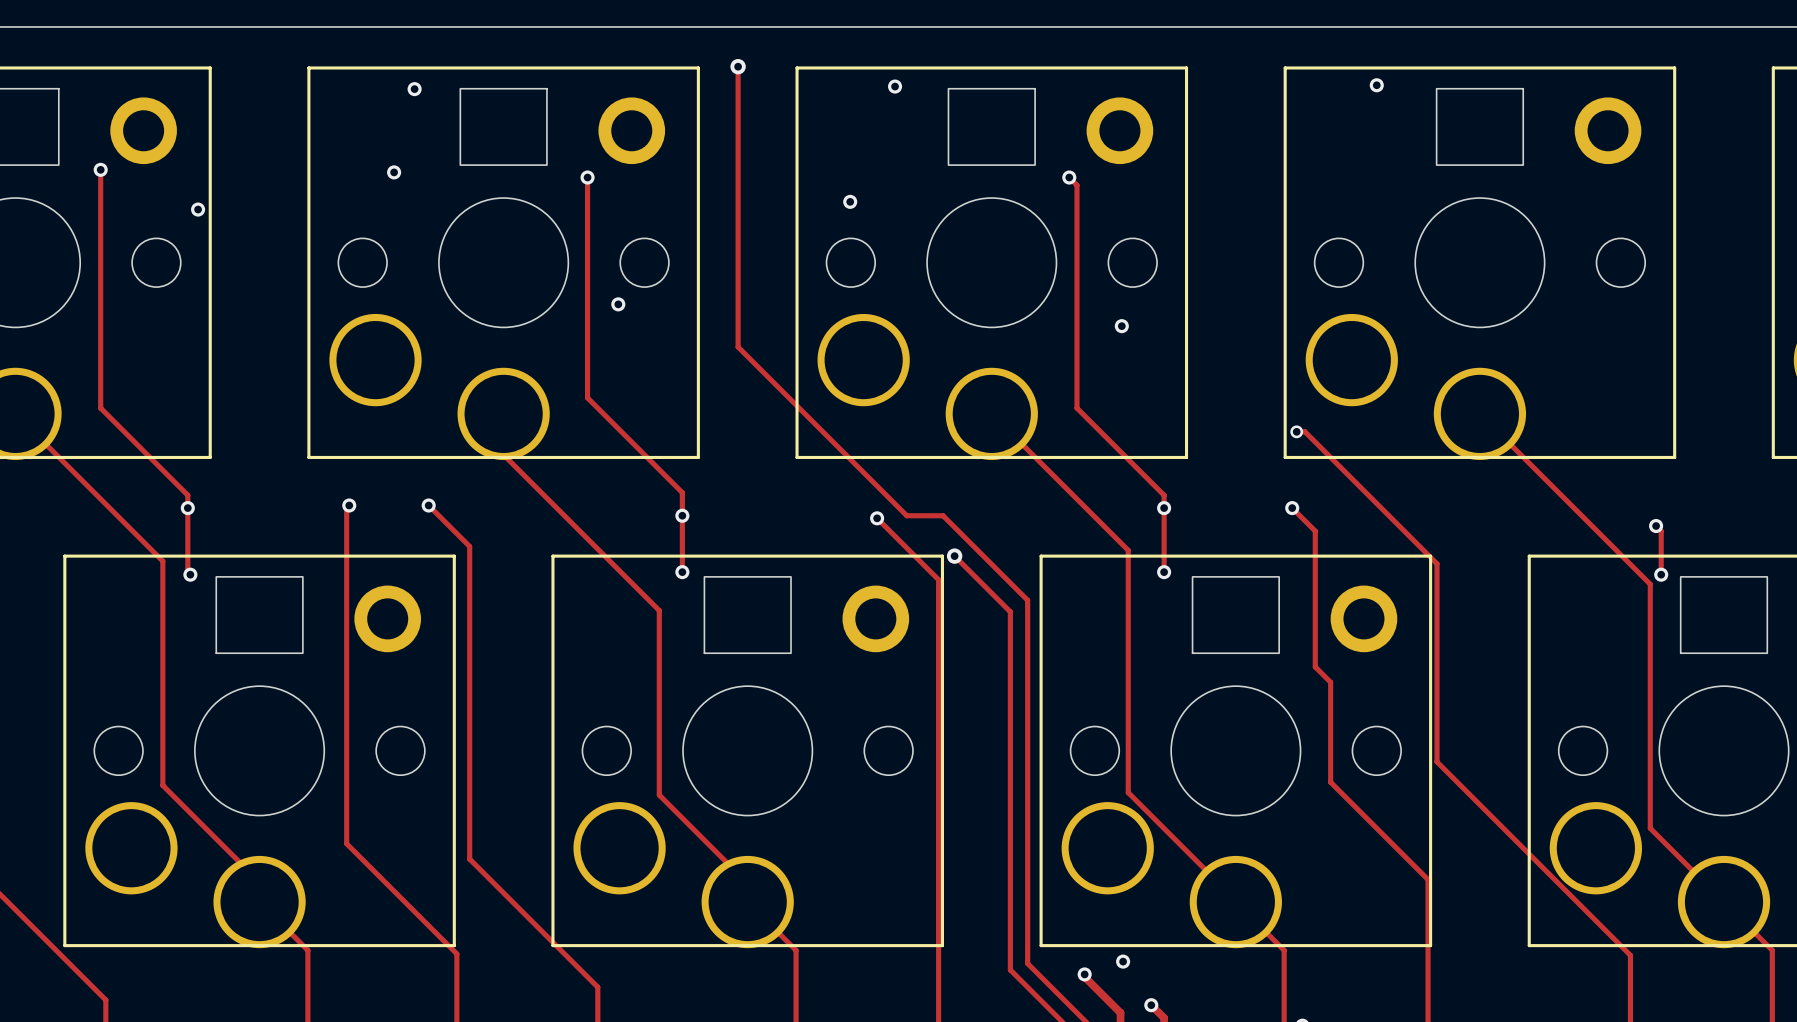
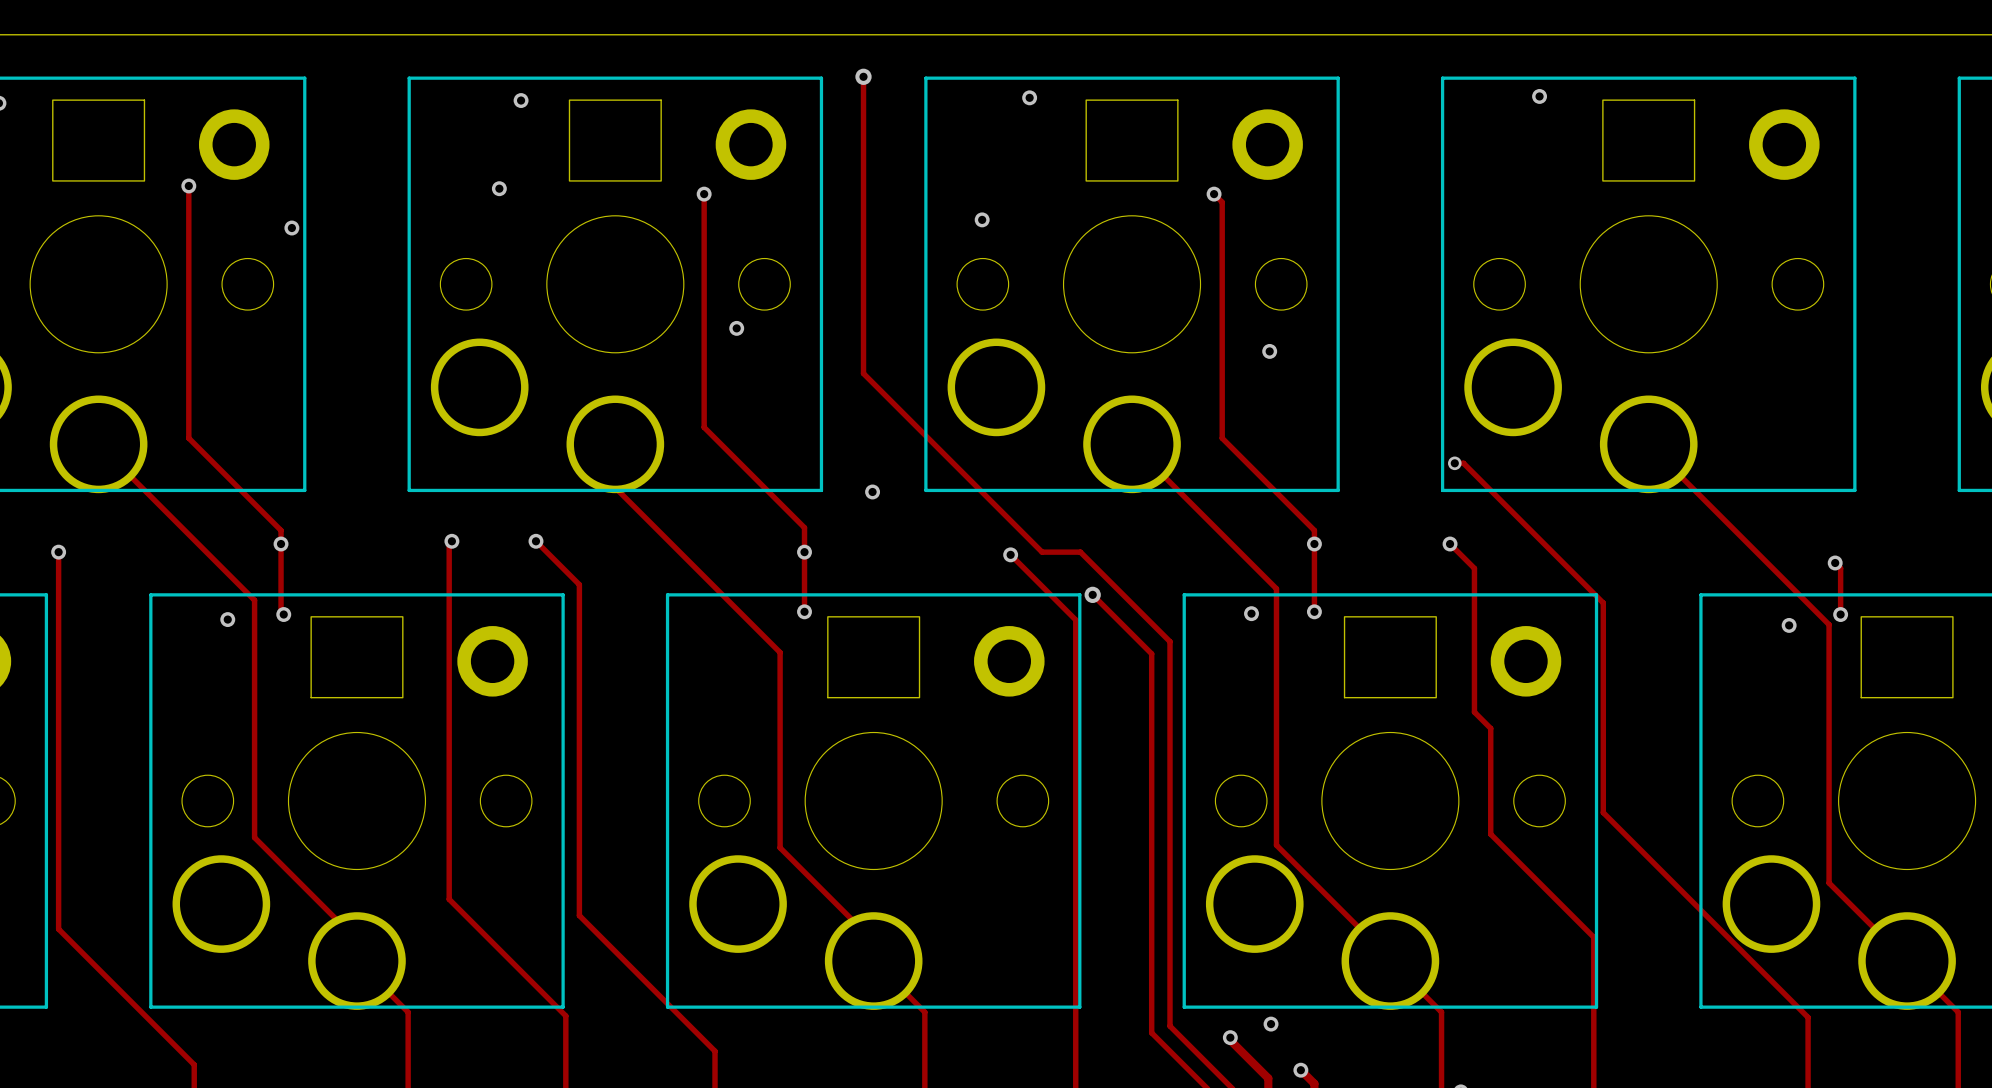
via: none -> (872, 491)
via: none -> (1251, 613)
via: none -> (227, 619)
via: none -> (1789, 625)

